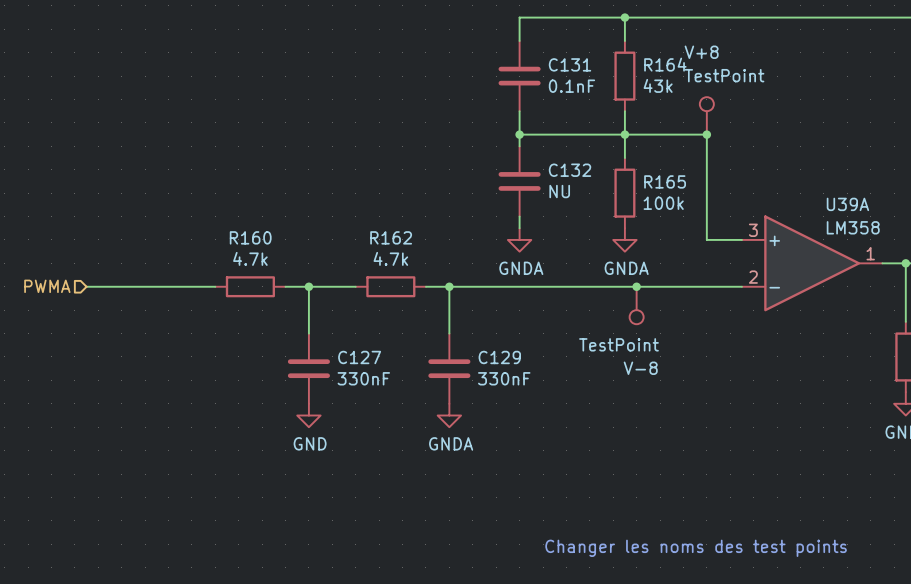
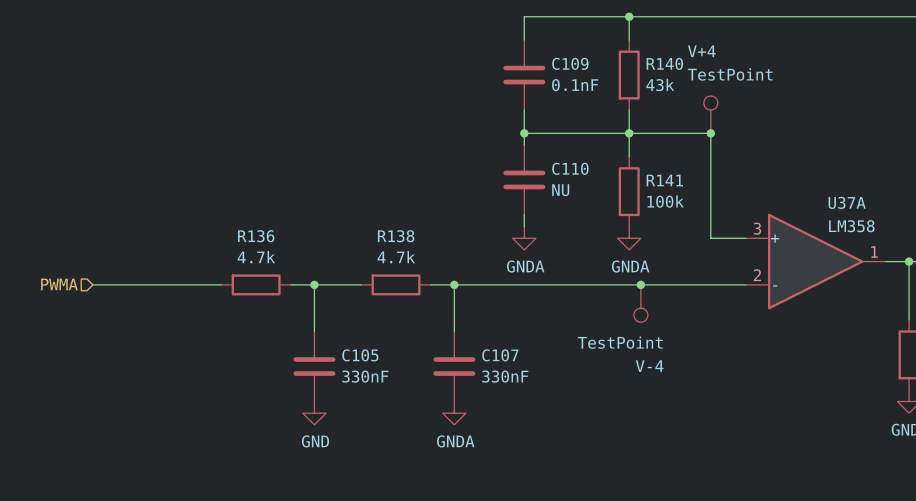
V+8 name: V+8 (701, 52) -> V+4 (701, 51)
C131 name: C131 (570, 64) -> C109 (570, 63)
R164 name: R164 (665, 64) -> R140 (664, 63)
C132 name: C132 (570, 170) -> C110 (570, 168)
R165 name: R165 (665, 181) -> R141 (664, 180)
U39A name: U39A (847, 204) -> U37A (847, 202)
R160 name: R160 (250, 237) -> R136 (256, 236)
R162 name: R162 (391, 237) -> R138 (396, 236)
C127 name: C127 (359, 357) -> C105 (360, 355)
C129 name: C129 (499, 357) -> C107 (500, 355)
V-8 name: V-8 (640, 368) -> V-4 (649, 366)

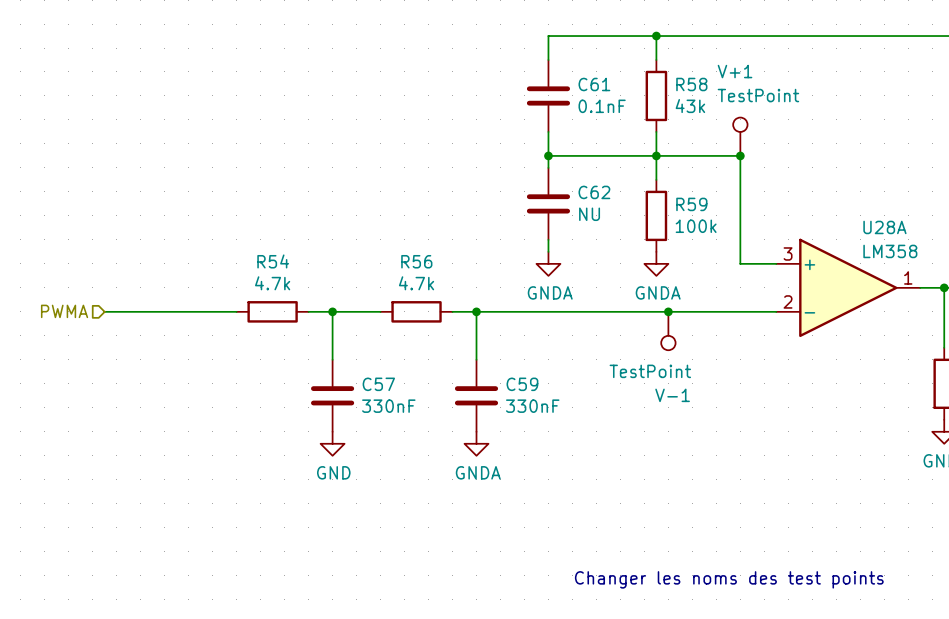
V+4 name: V+4 (701, 51) -> V+1 (735, 71)
C109 name: C109 (570, 63) -> C61 (594, 84)
R140 name: R140 (664, 63) -> R58 (691, 84)
C110 name: C110 (570, 168) -> C62 (594, 192)
R141 name: R141 (664, 180) -> R59 (691, 204)
U37A name: U37A (847, 202) -> U28A (884, 227)
R136 name: R136 (256, 236) -> R54 (273, 261)
R138 name: R138 (396, 236) -> R56 (416, 261)
C105 name: C105 (360, 355) -> C57 (378, 384)
C107 name: C107 (500, 355) -> C59 (522, 384)
V-4 name: V-4 (649, 366) -> V-1 (672, 395)

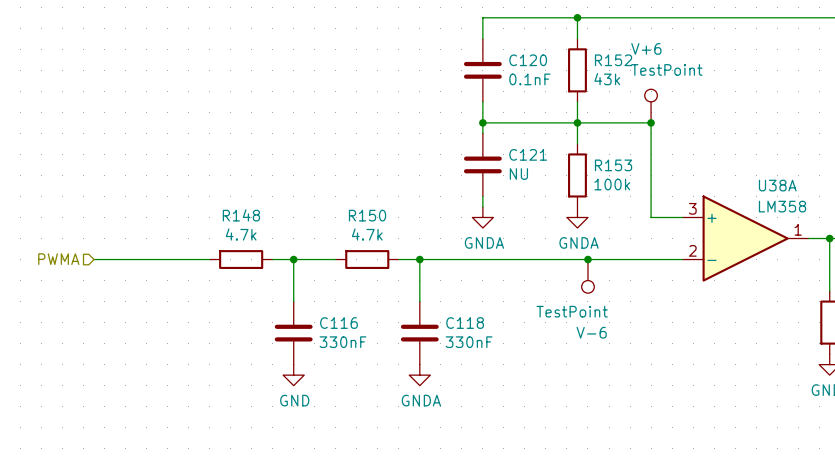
V+1 name: V+1 (735, 71) -> V+6 (646, 48)
C61 name: C61 (594, 84) -> C120 (528, 60)
R58 name: R58 (691, 84) -> R152 (613, 60)
C62 name: C62 (594, 192) -> C121 (528, 154)
R59 name: R59 (691, 204) -> R153 (613, 165)
U28A name: U28A (884, 227) -> U38A (777, 185)
R54 name: R54 (273, 261) -> R148 (241, 215)
R56 name: R56 (416, 261) -> R150 (367, 215)
C57 name: C57 (378, 384) -> C116 (338, 323)
C59 name: C59 (522, 384) -> C118 (465, 323)
V-1 name: V-1 (672, 395) -> V-6 (591, 332)

